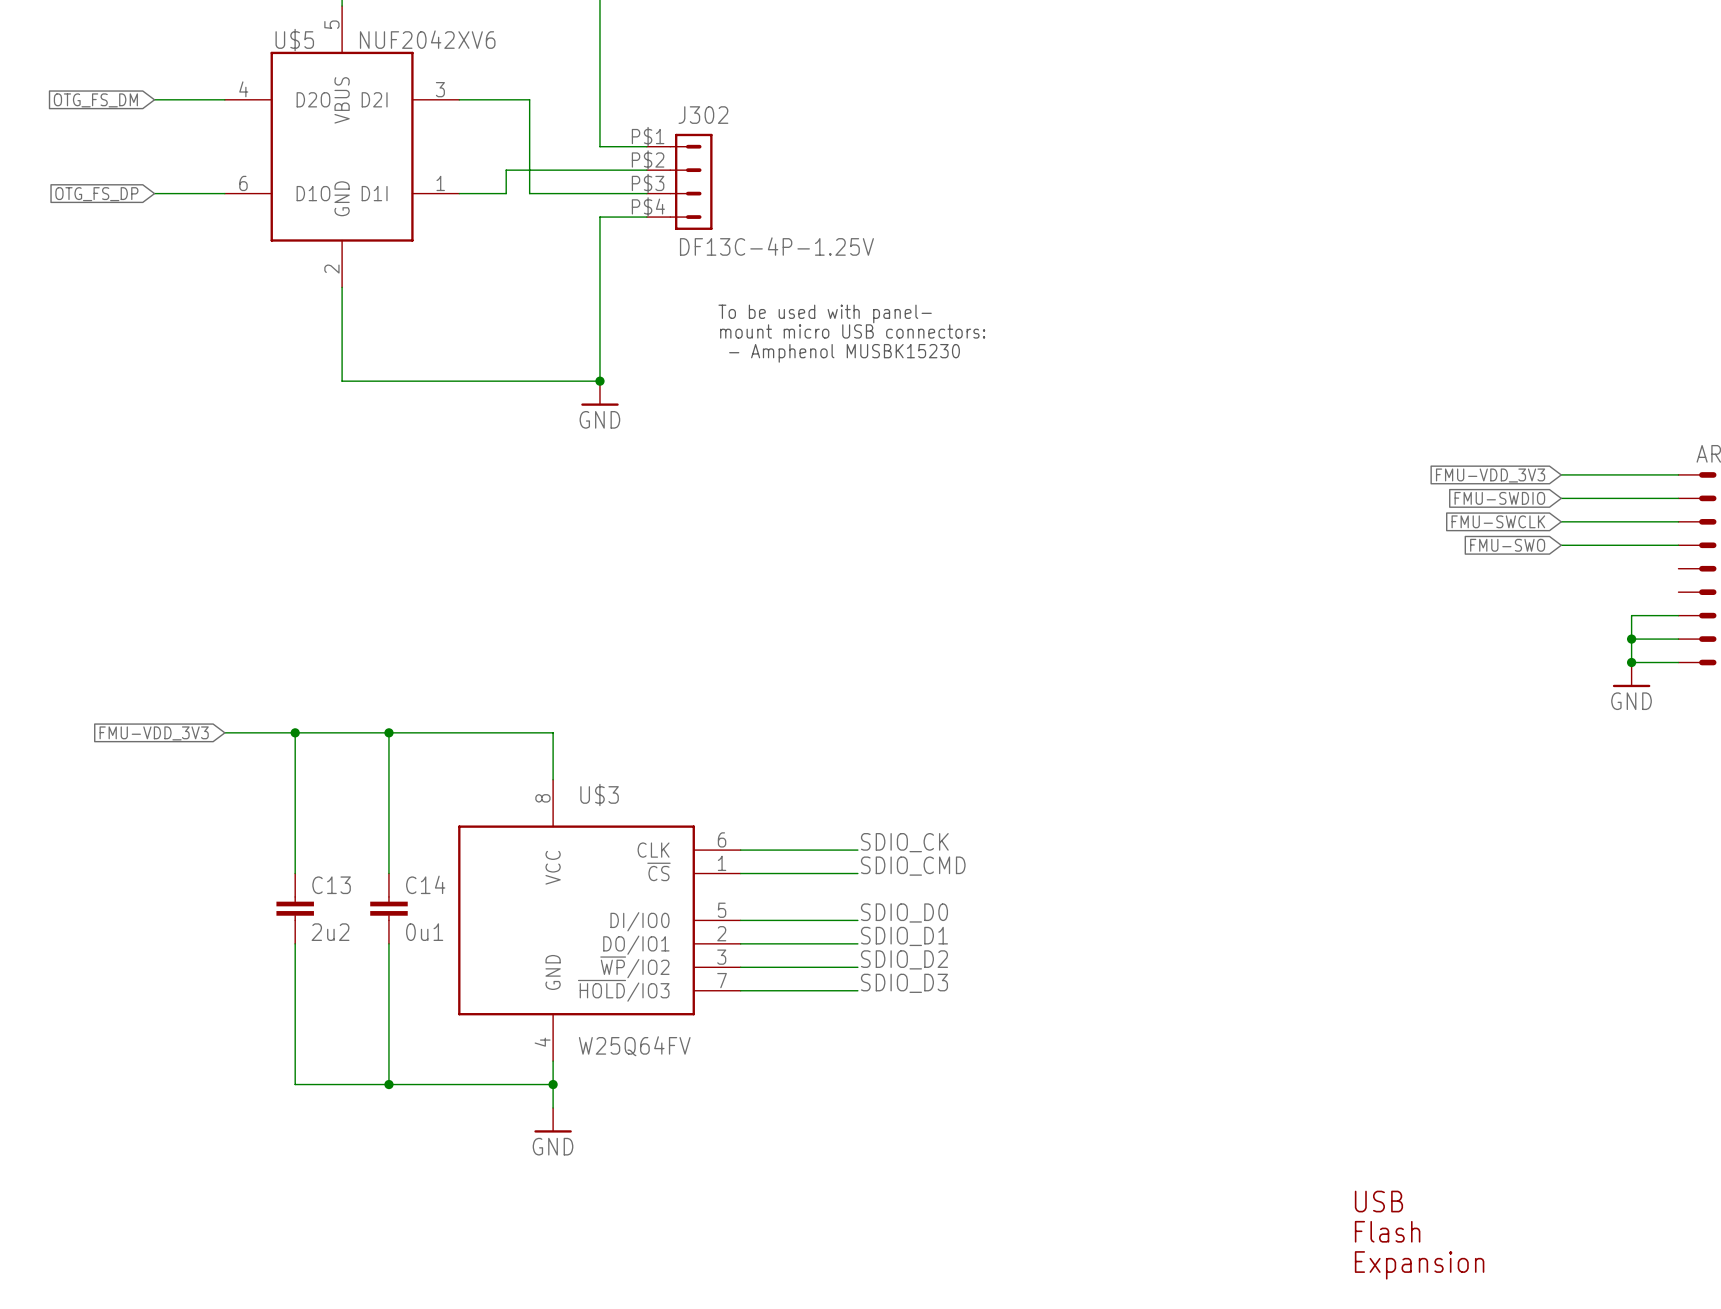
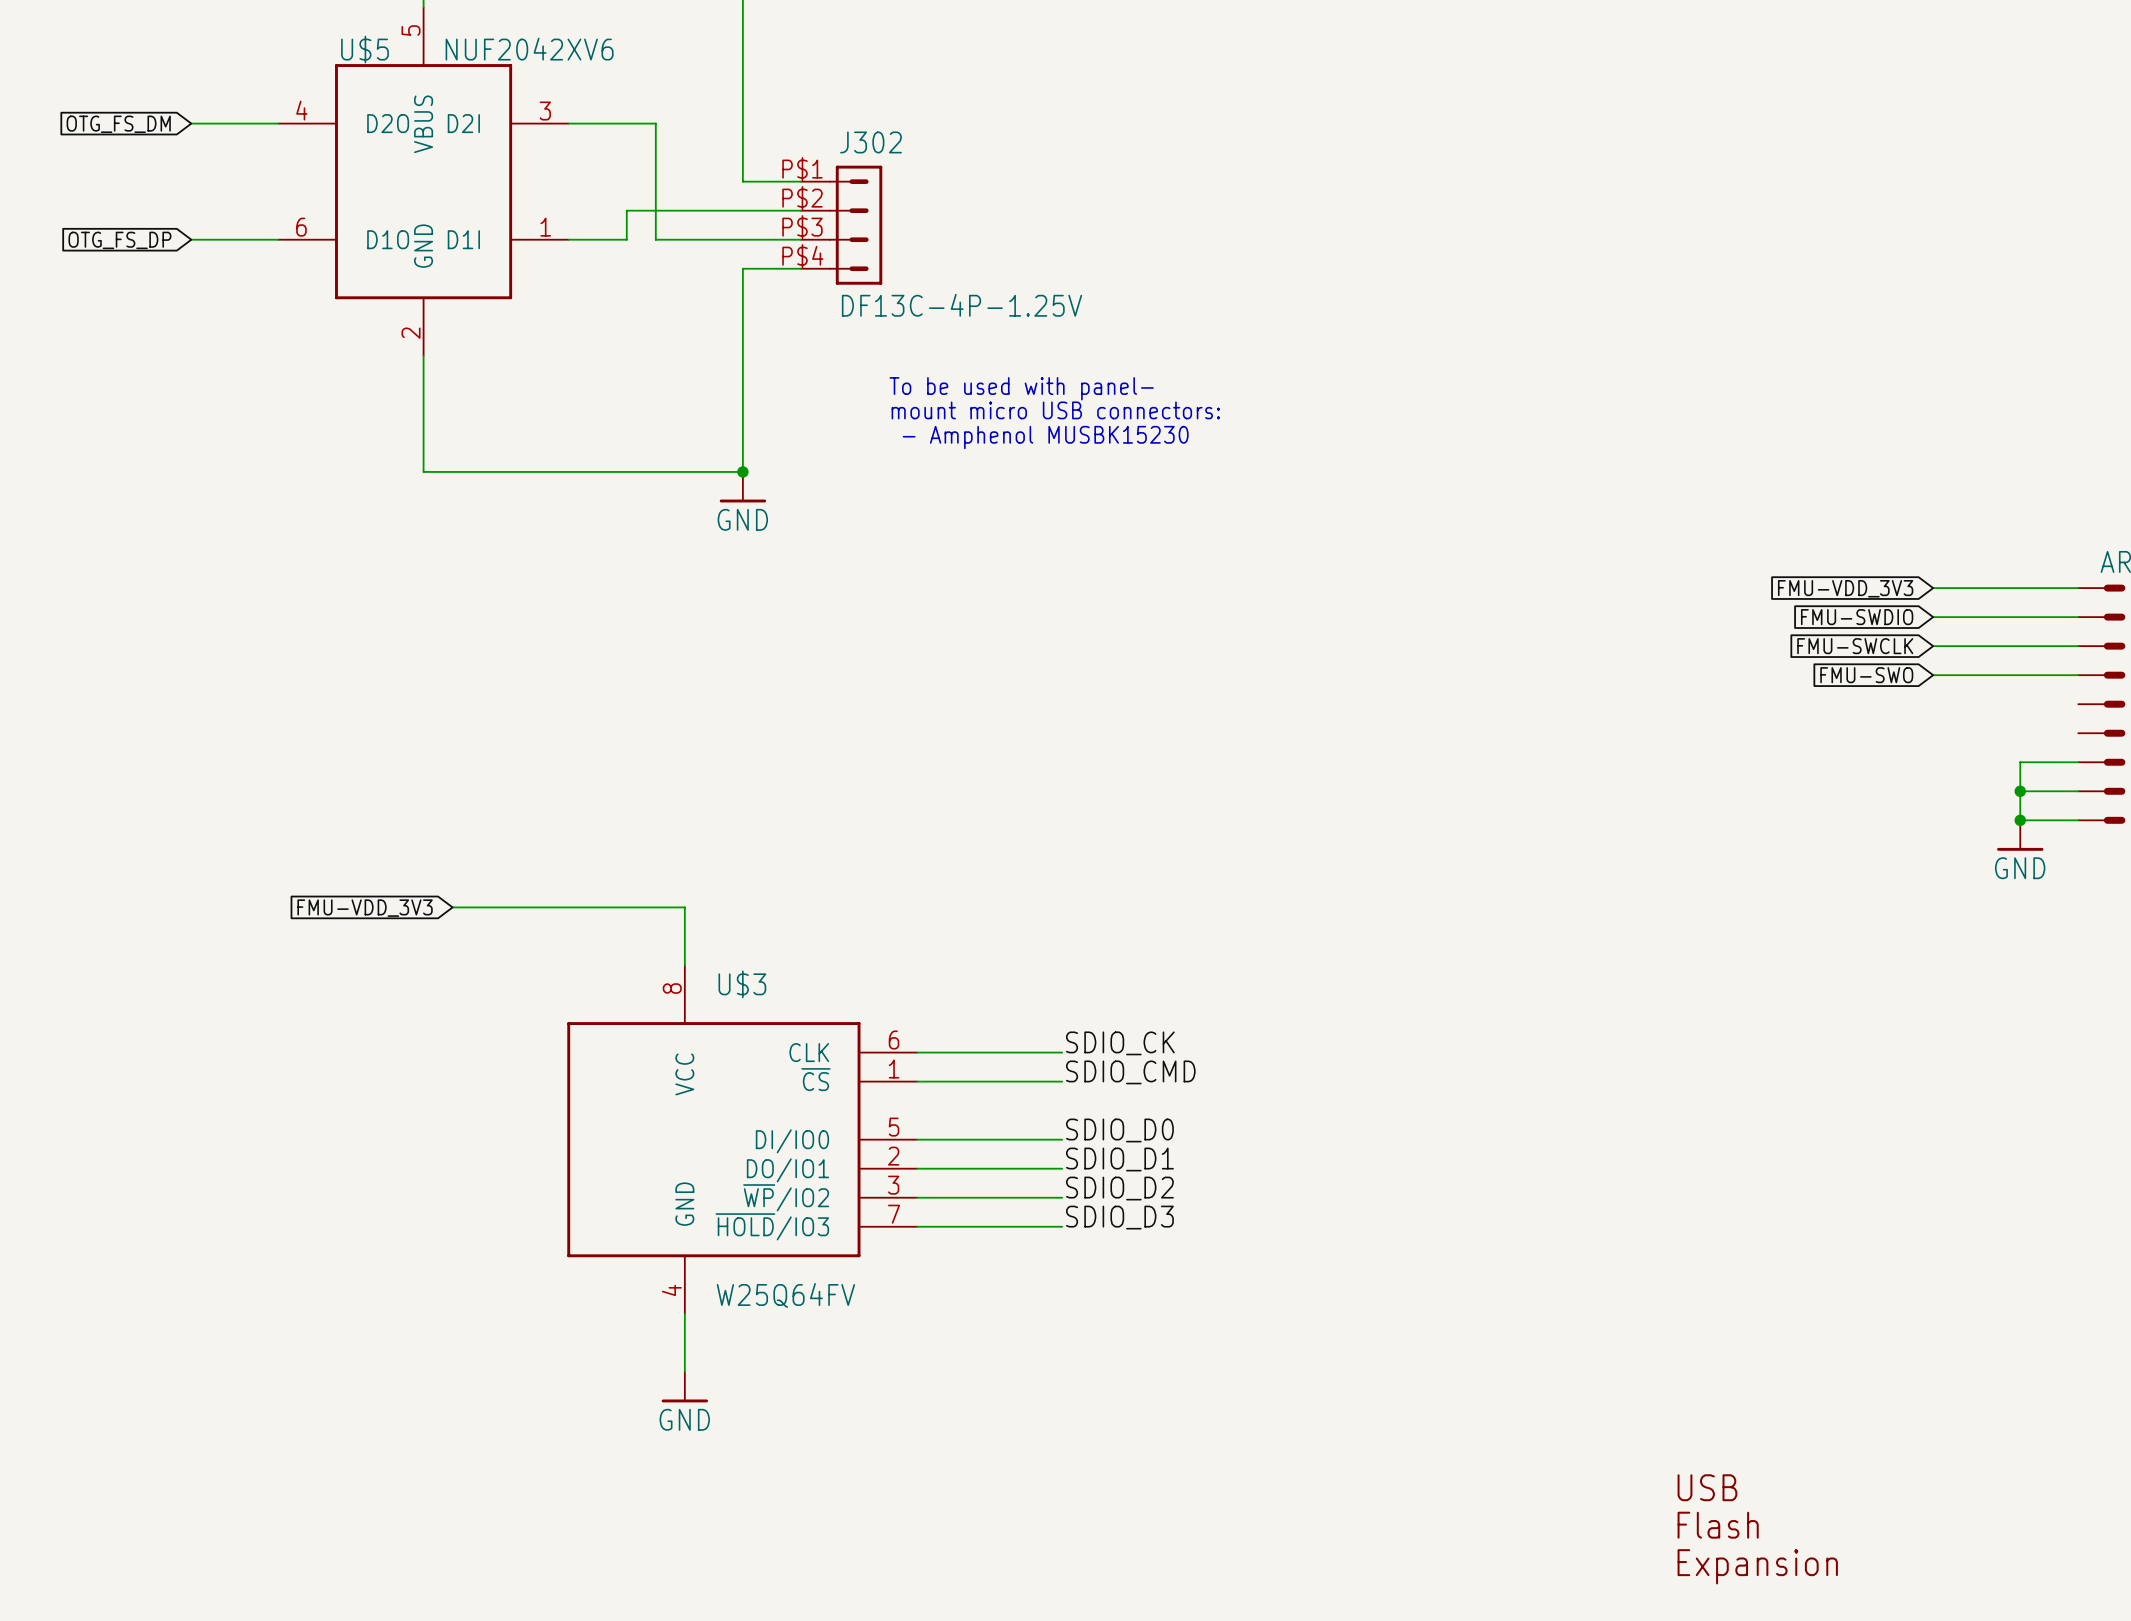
wire: (224, 732) (365, 732) -> none
wire: (295, 732) (295, 873) -> none
junction: (295, 732) -> none
wire: (388, 732) (388, 873) -> none
junction: (388, 732) -> none
global label position: FMU-VDD_3V3 (154, 733) -> FMU-VDD_3V3 (365, 908)
C13: 2u2 (295, 908) -> none
C14: 0u1 (388, 908) -> none
wire: (295, 943) (295, 1084) (553, 1084) -> none
wire: (388, 943) (388, 1084) -> none
junction: (388, 1084) -> none
junction: (553, 1084) -> none

